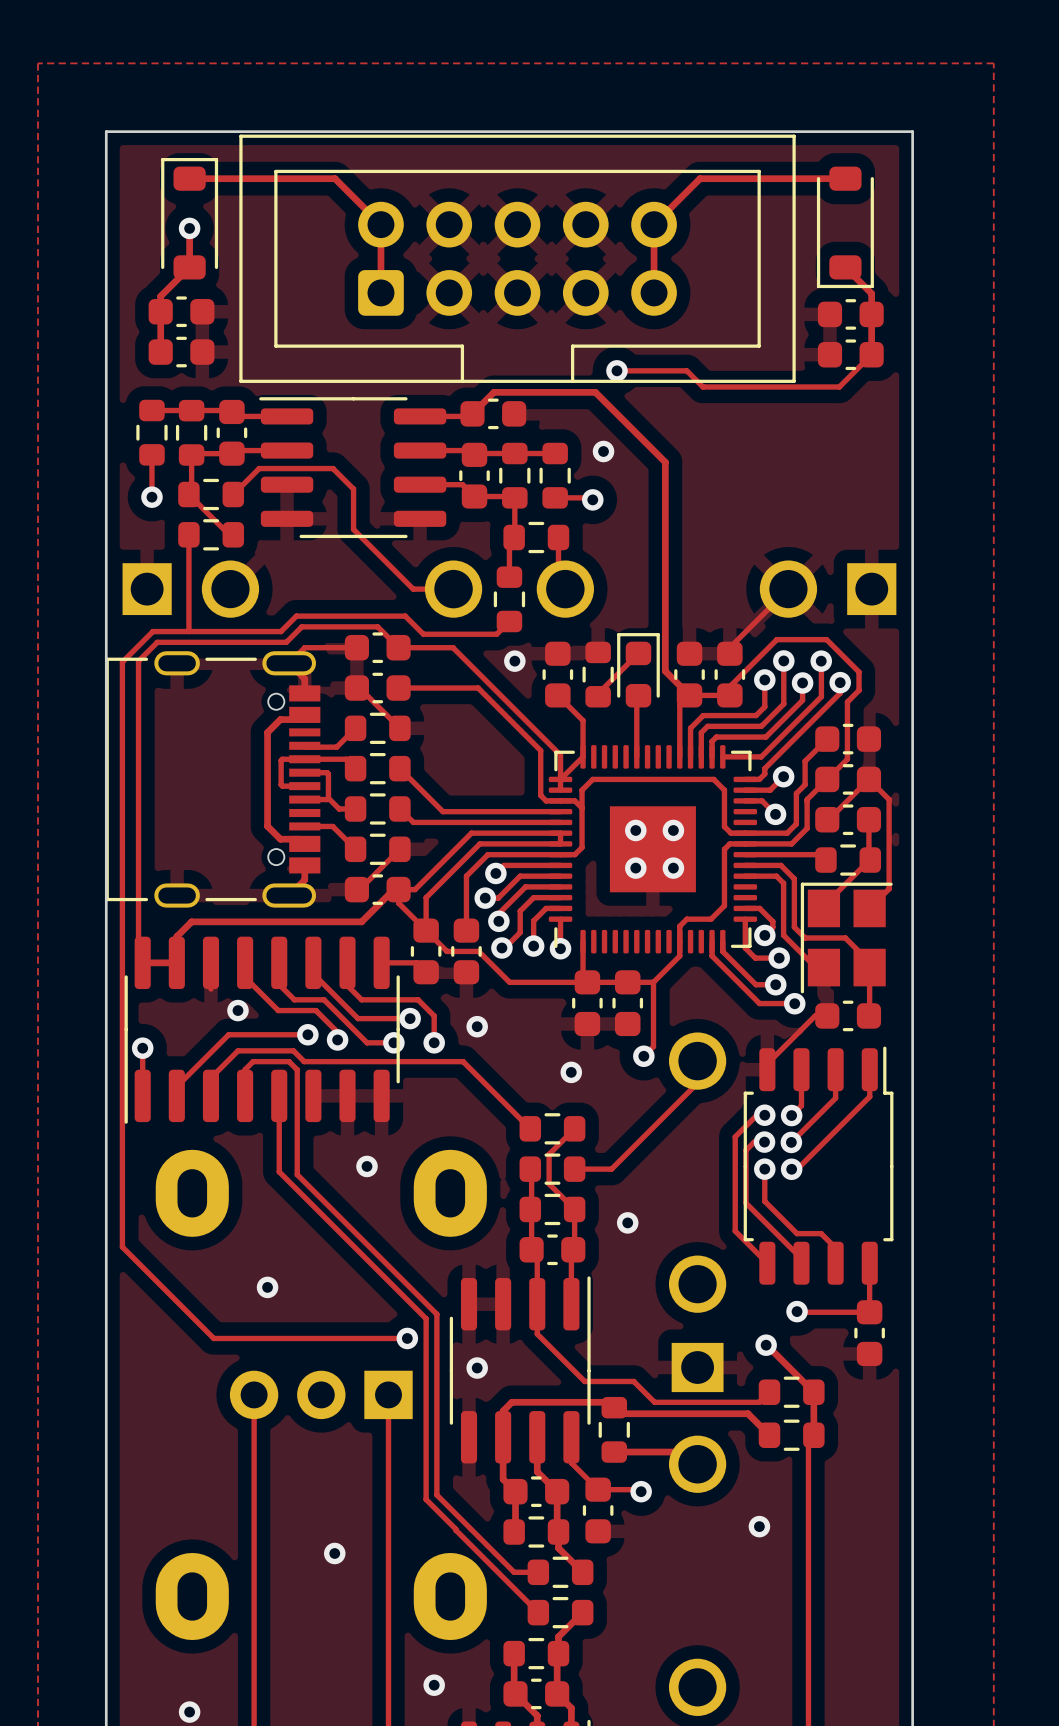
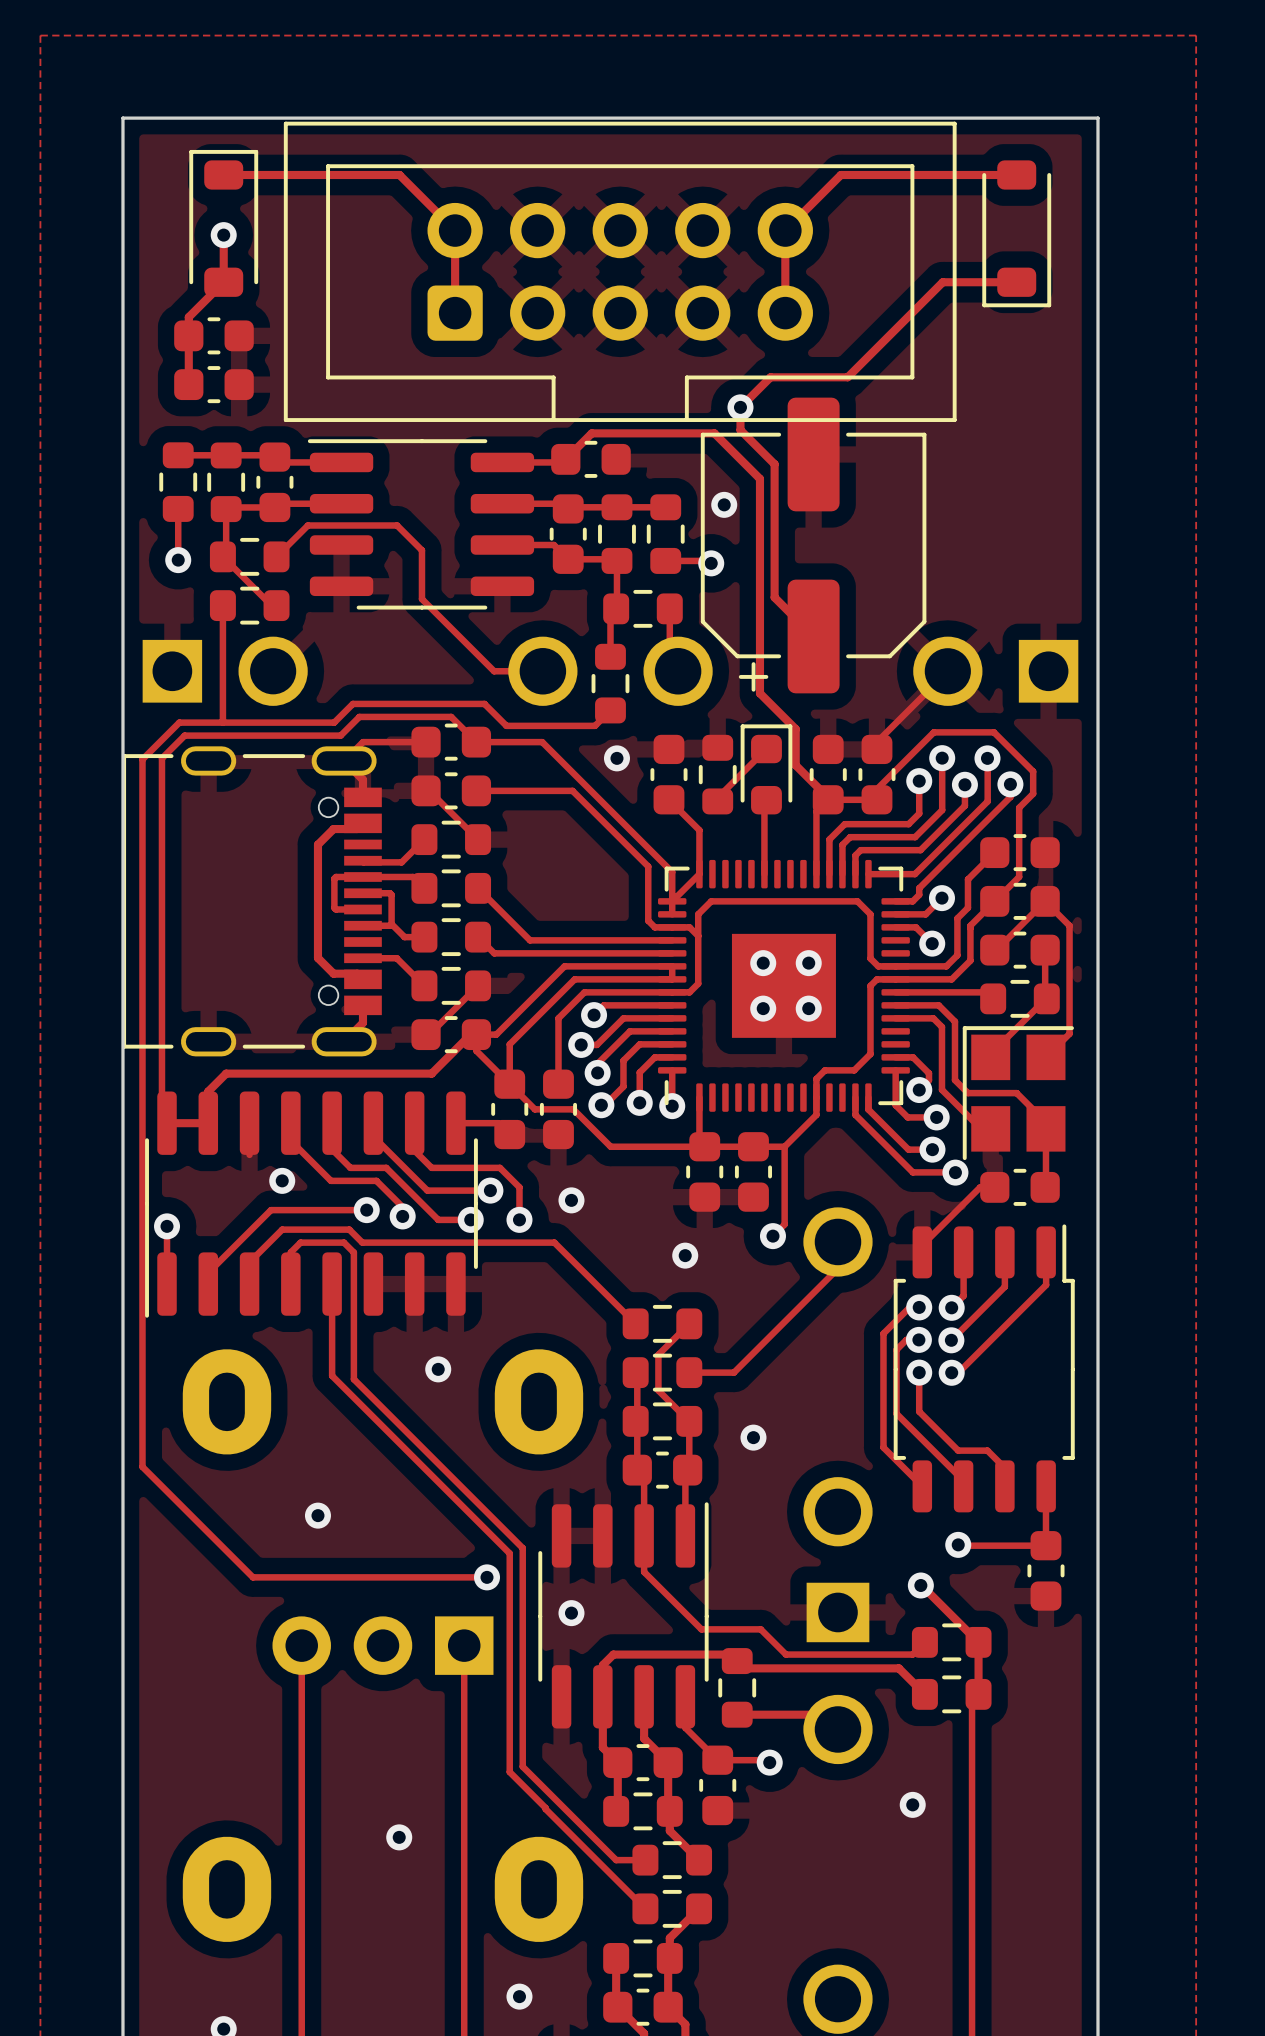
track: (845, 267) (871, 293) (871, 354) (839, 386) (702, 386) (686, 370) (616, 370) -> (1016, 282) (942, 282) (847, 377) (770, 377) (740, 407) (740, 430) (774, 464) (774, 597) (813, 636)
part: (850, 314) -> none
part: (850, 354) -> none
track: (633, 429) (665, 462) (665, 671) (689, 695) -> (759, 478) (759, 693) (795, 729) (795, 765) (828, 799)
part: none -> (813, 545)

